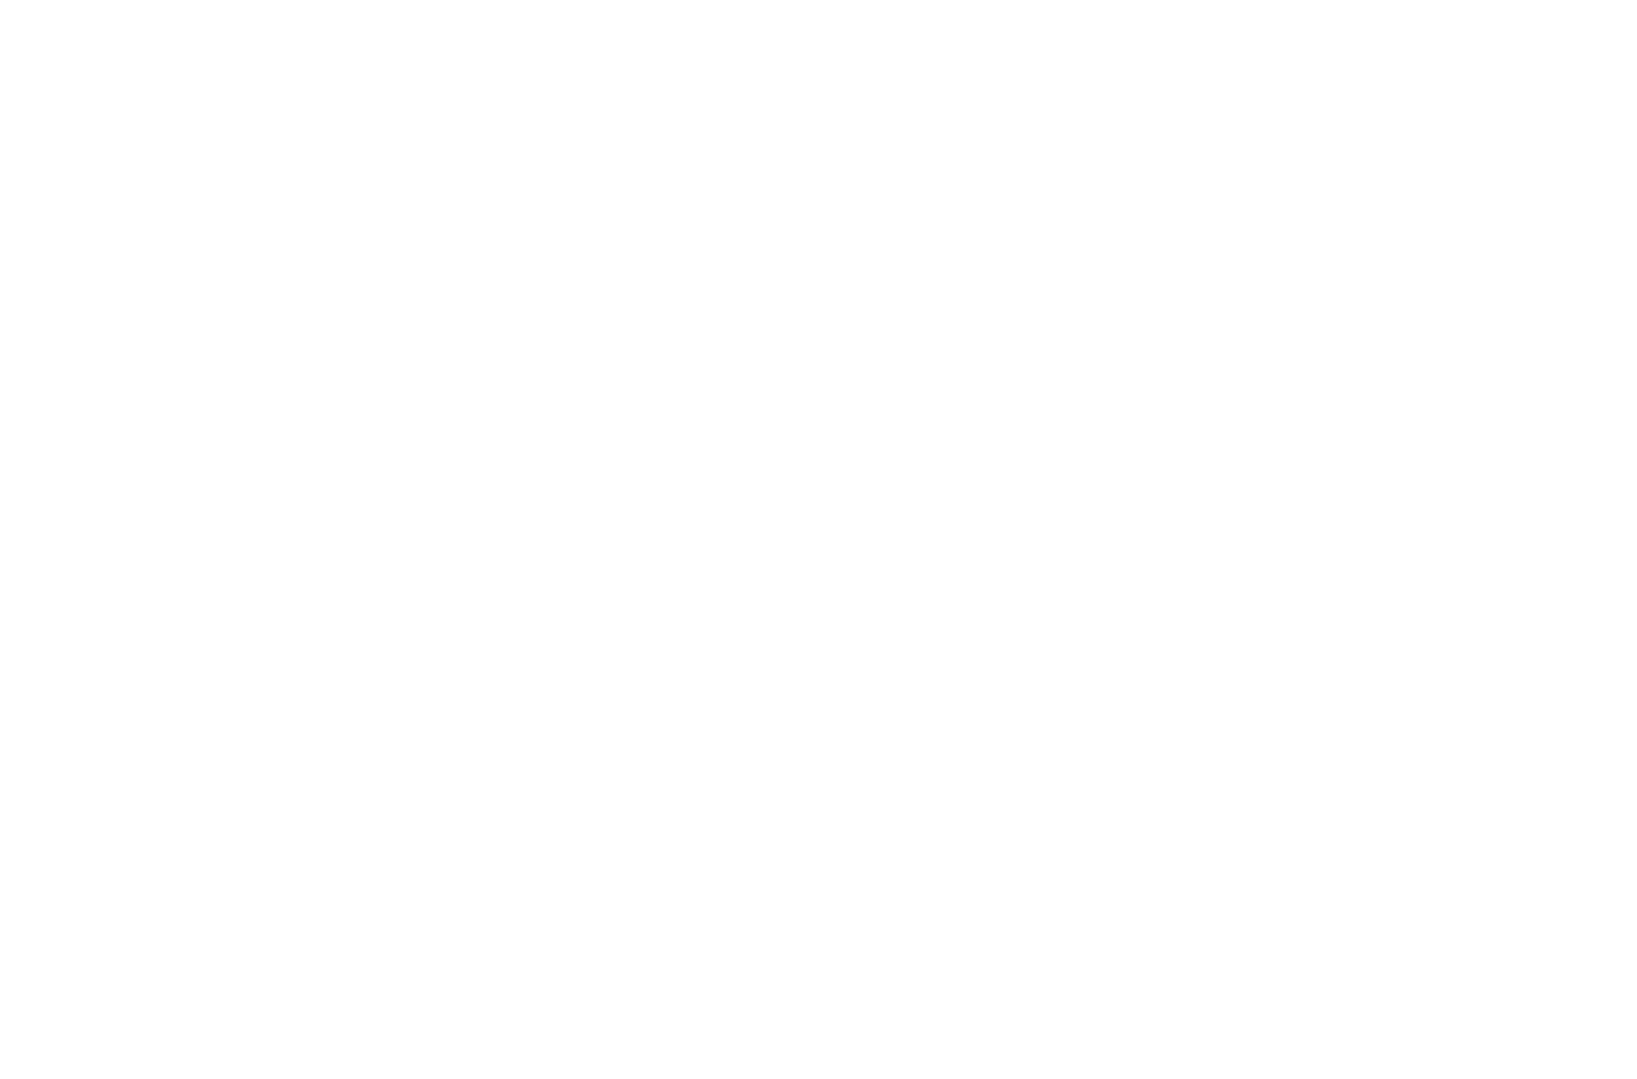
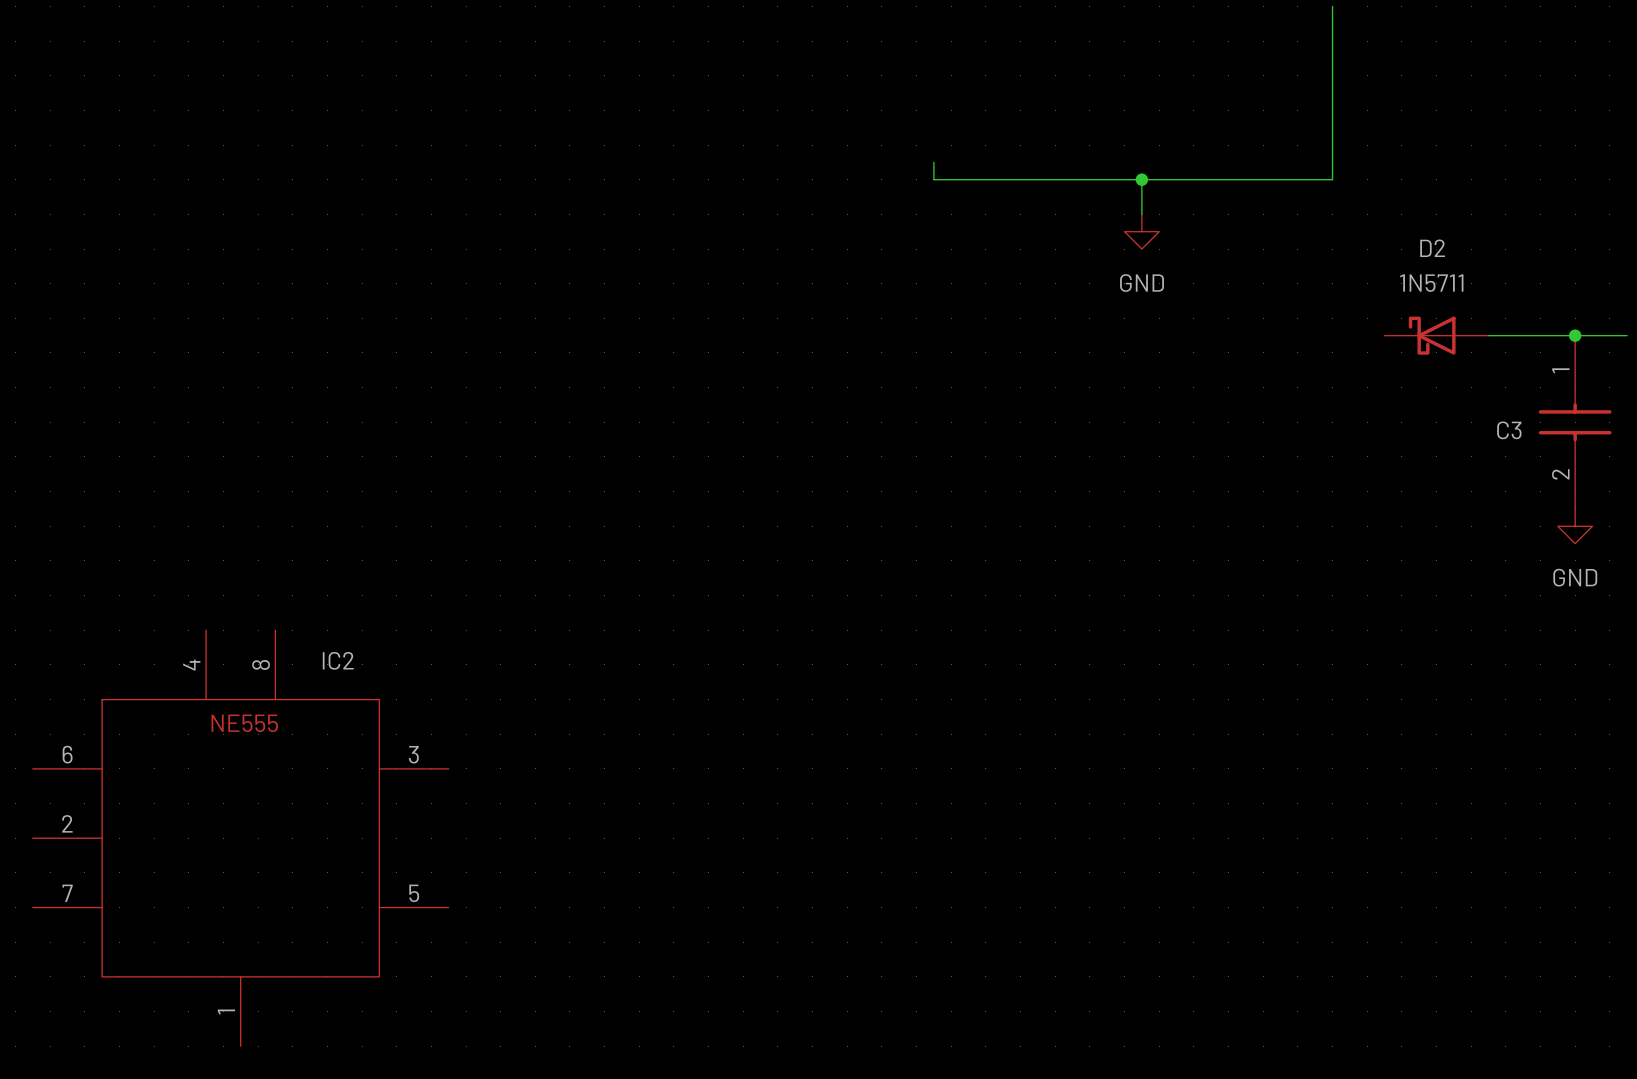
wire: none -> (1332, 6) (1332, 179) (933, 179) (933, 162)
wire: none -> (1141, 179) (1141, 214)
junction: none -> (1141, 179)
power symbol: none -> GND (1141, 231)
D2: none -> 1N5711 (1436, 335)
wire: none -> (1488, 335) (1627, 335)
junction: none -> (1575, 335)
C3: none -> (1575, 422)
power symbol: none -> GND (1575, 526)
IC2: none -> (240, 838)

